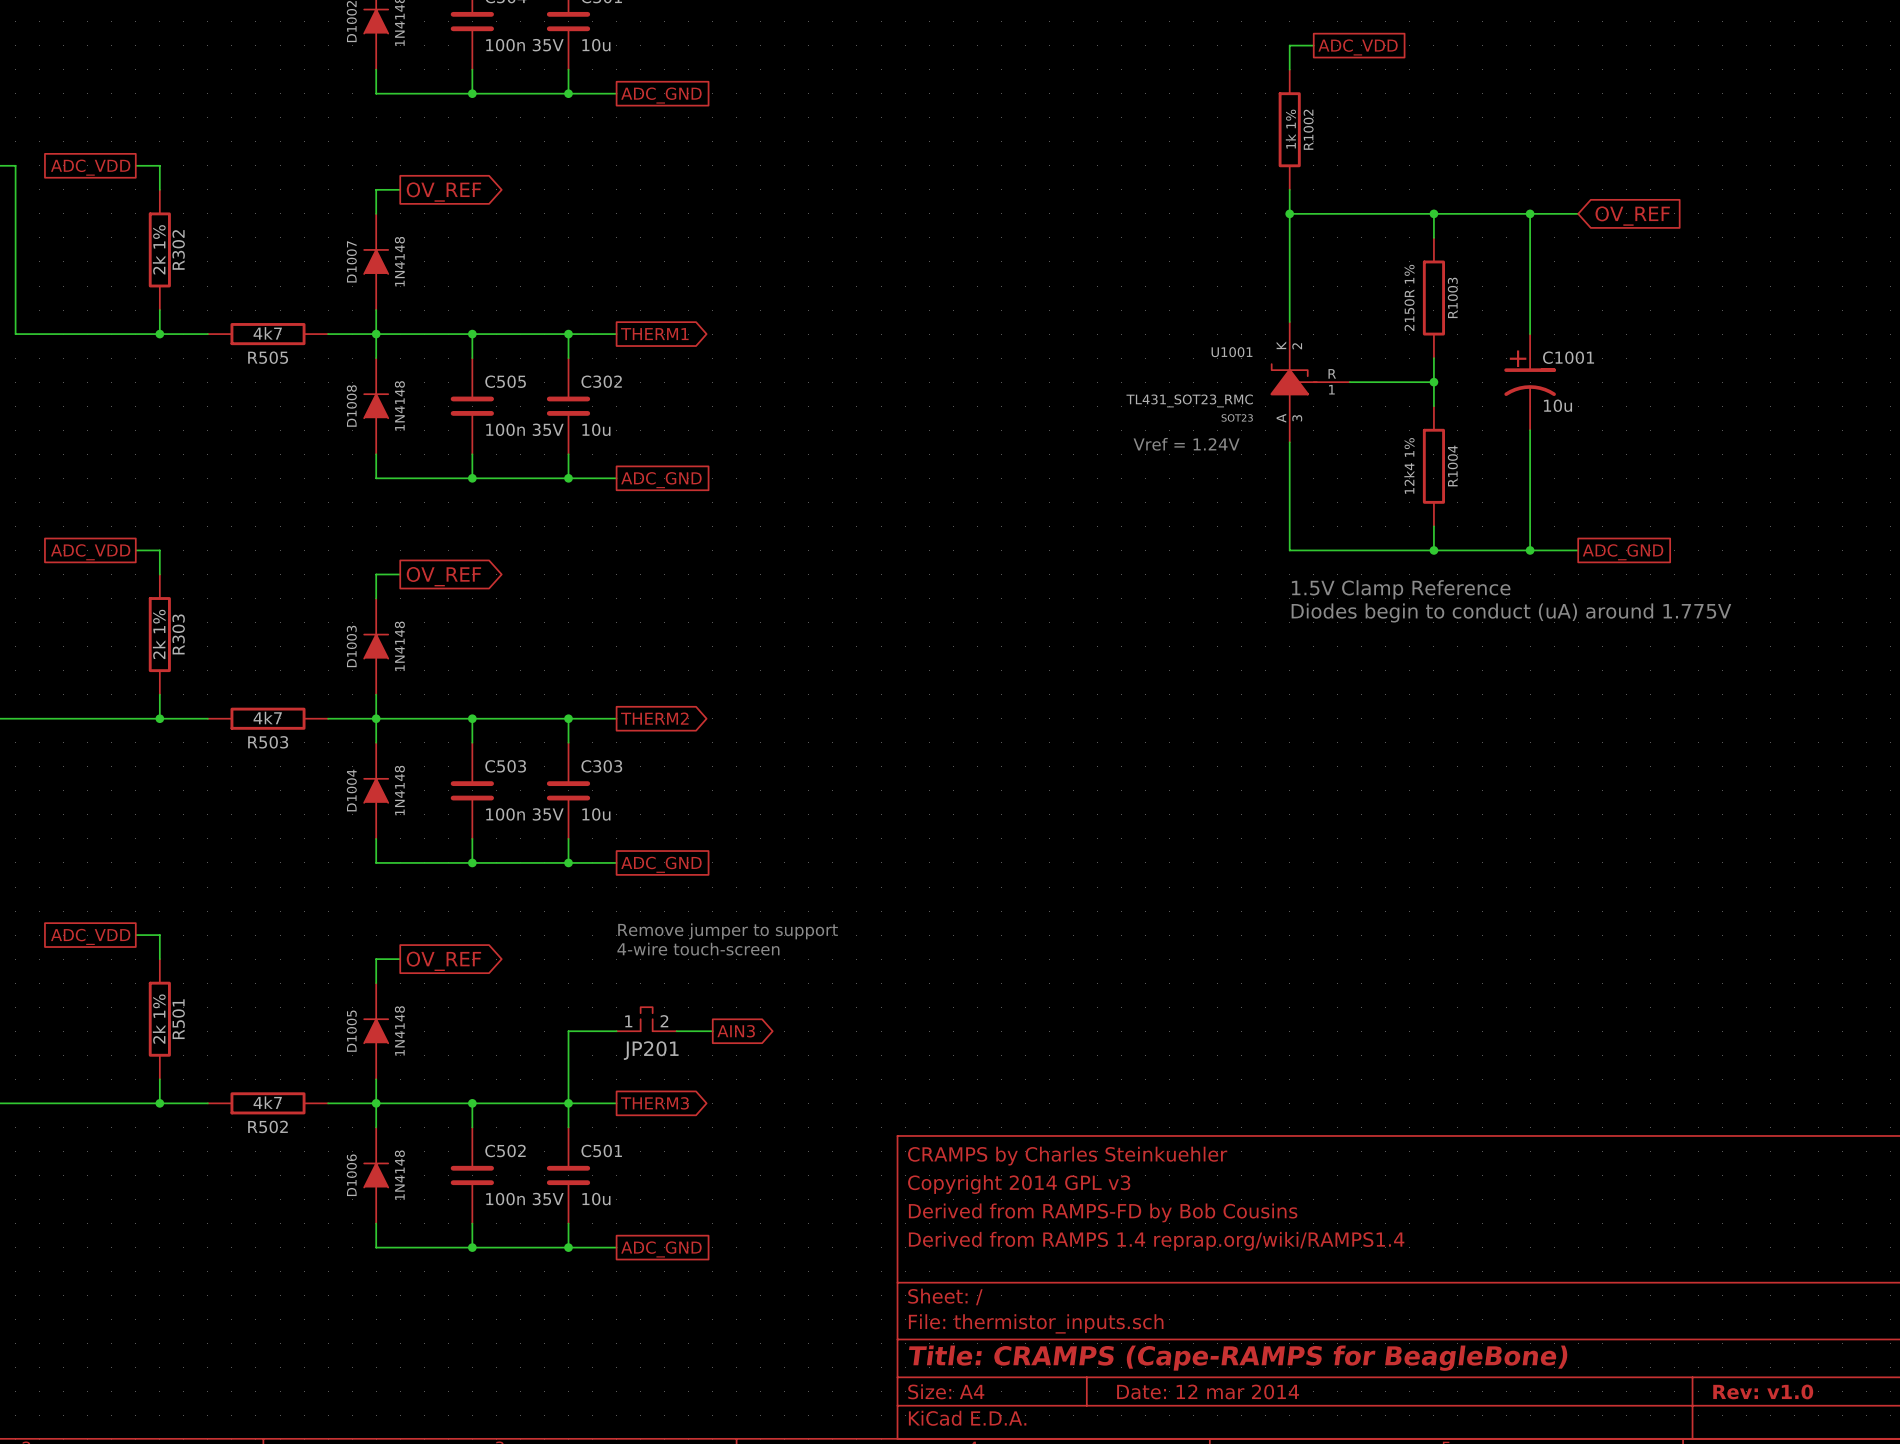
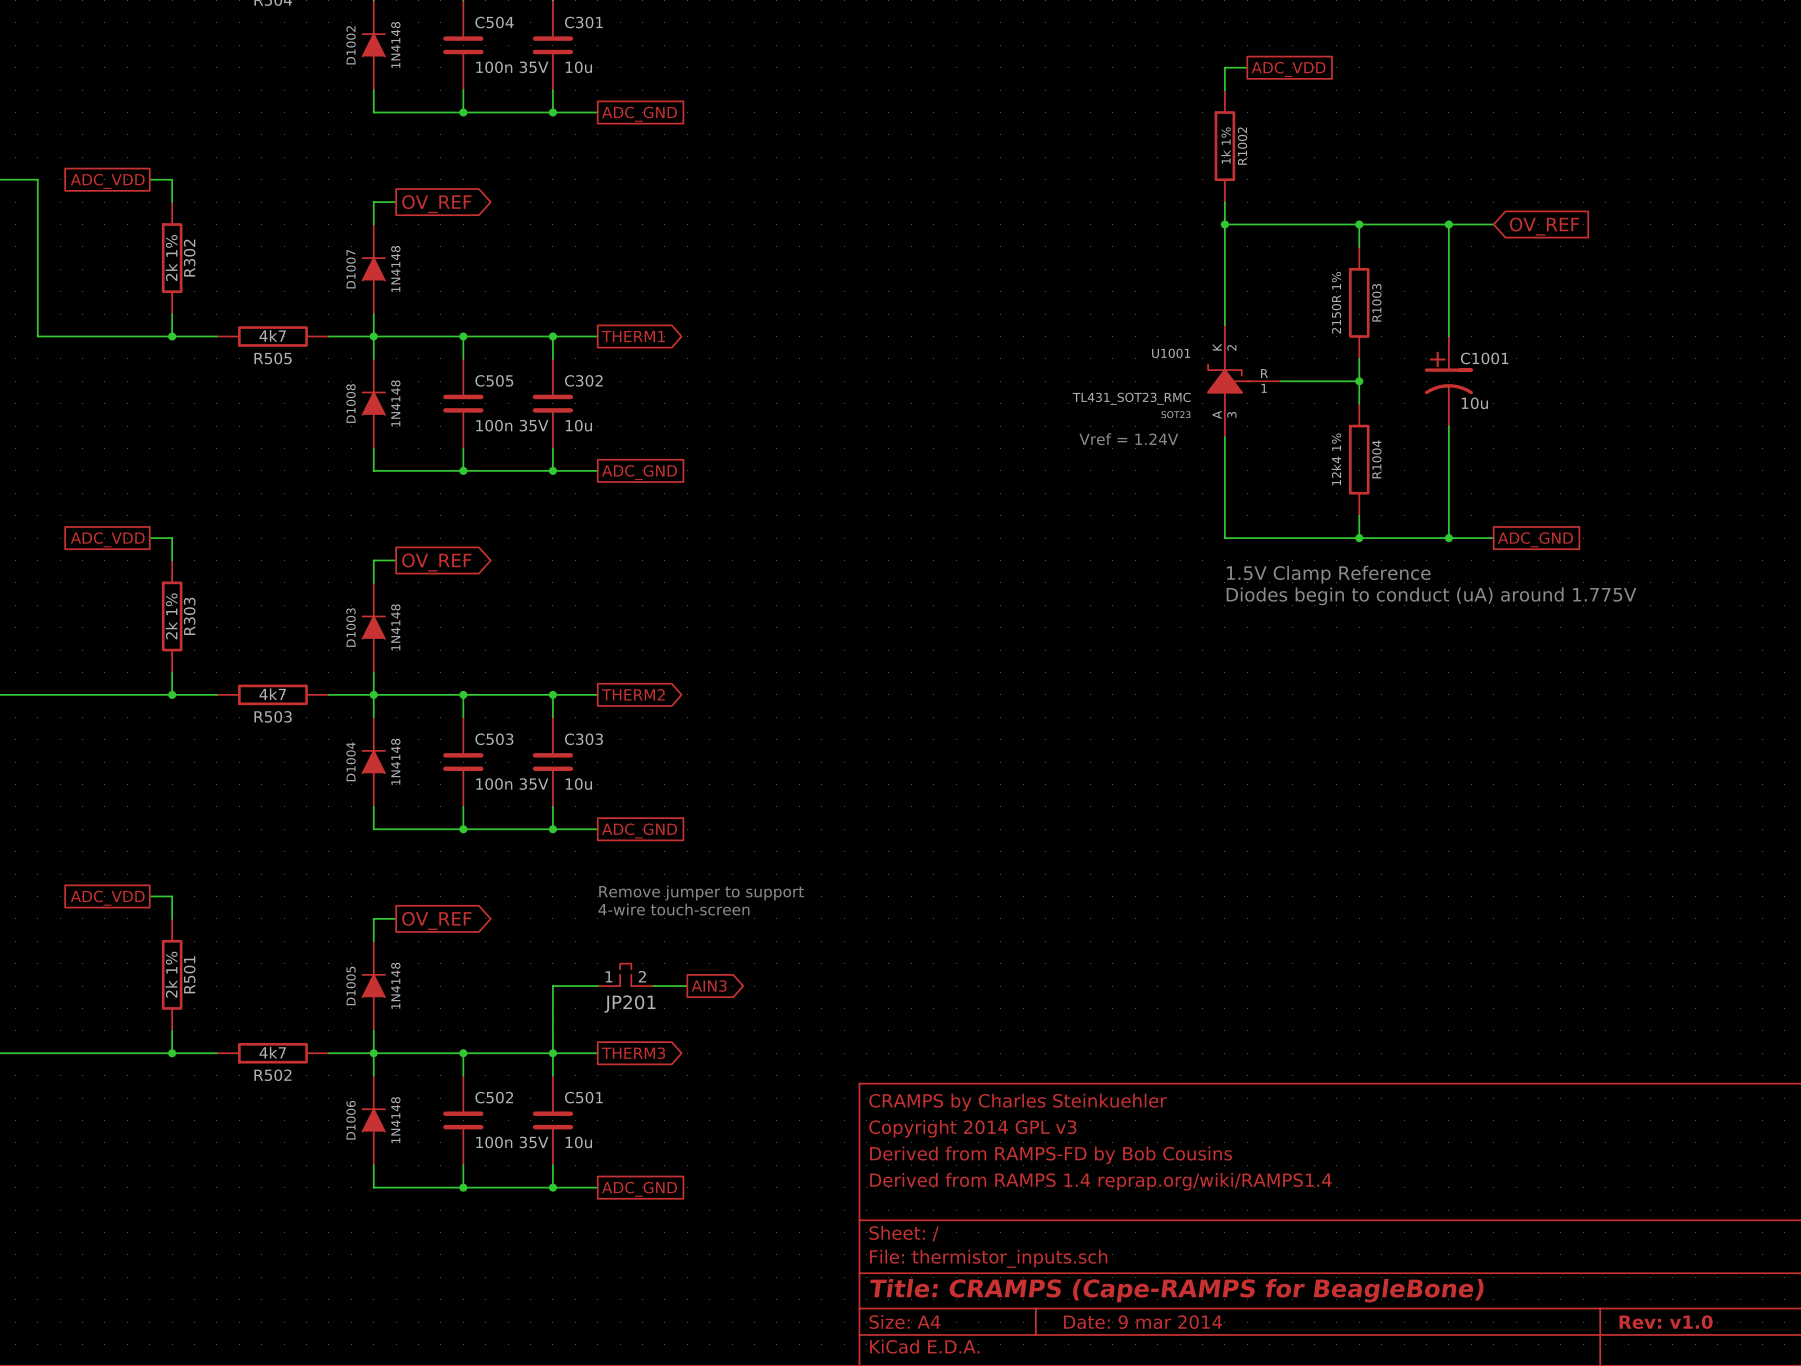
title block: Date: 12 mar 2014 (1208, 1391) -> Date: 9 mar 2014 (1143, 1322)

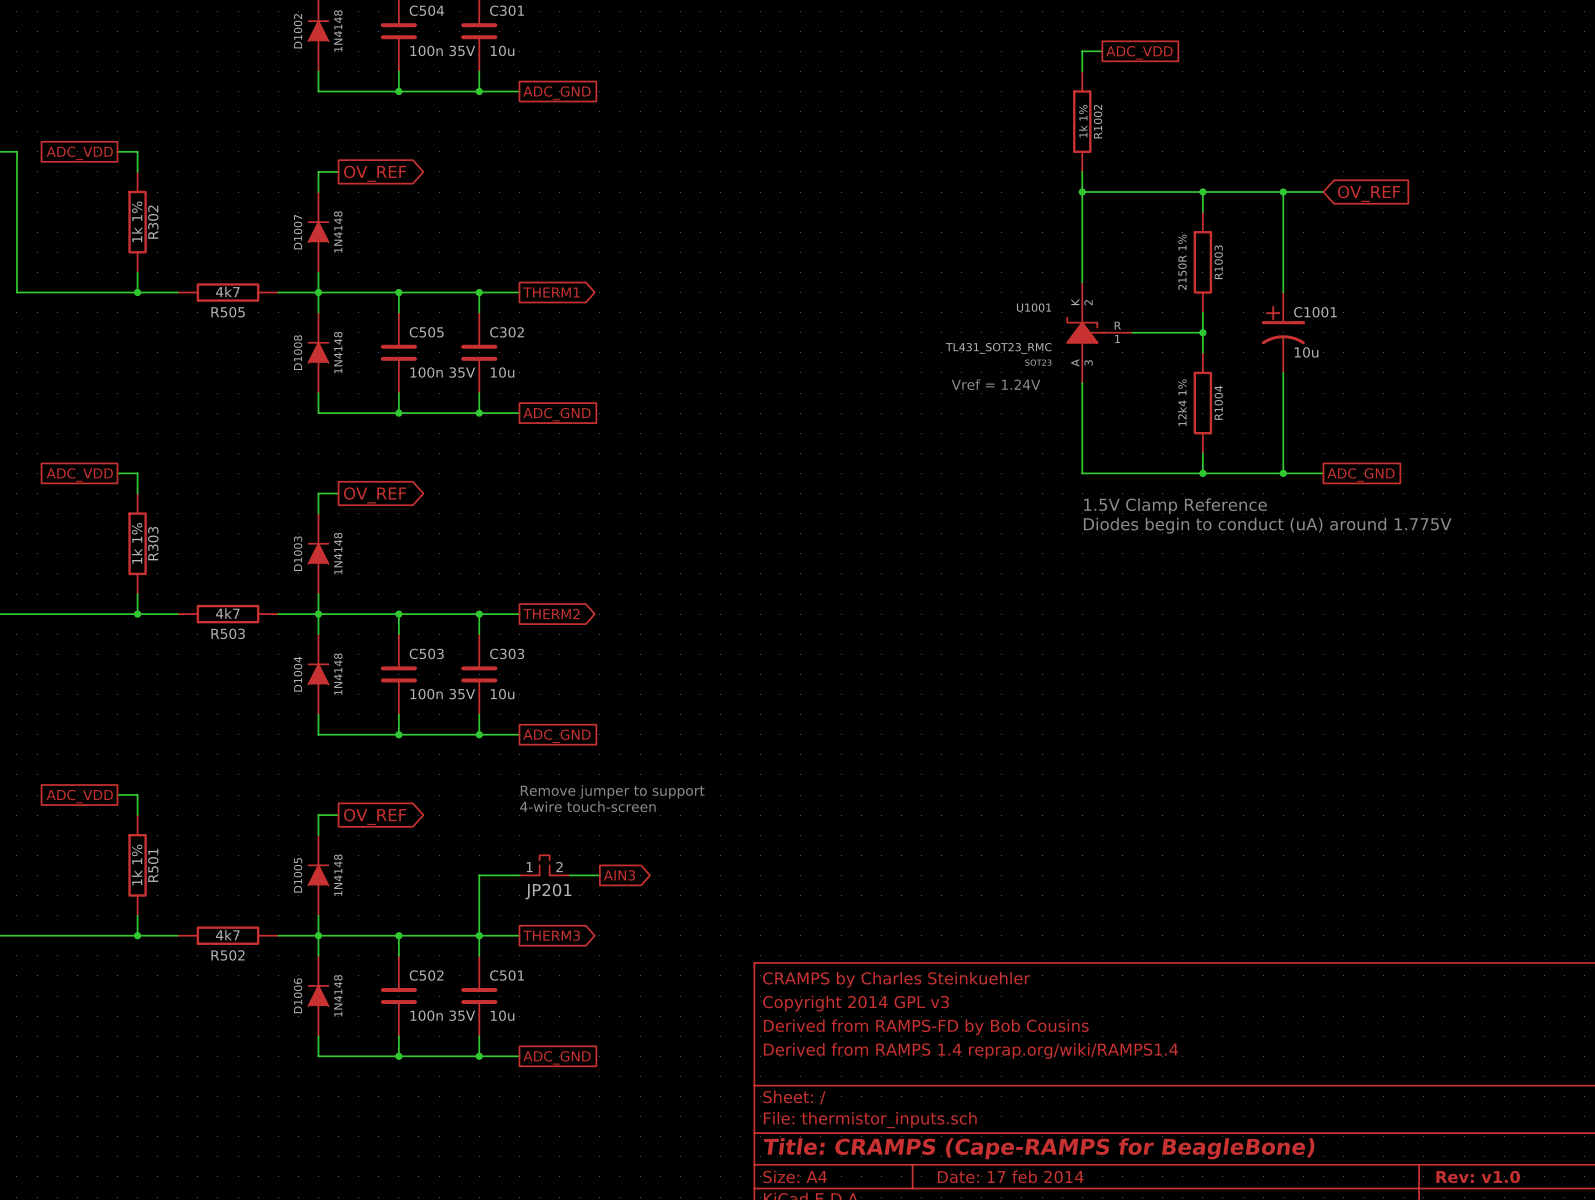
R302 value: 2k 1% (171, 257) -> 1k 1% (137, 221)
R303 value: 2k 1% (171, 616) -> 1k 1% (137, 543)
R501 value: 2k 1% (171, 974) -> 1k 1% (137, 864)
title block: Date: 9 mar 2014 (1143, 1322) -> Date: 17 feb 2014 (1010, 1176)

